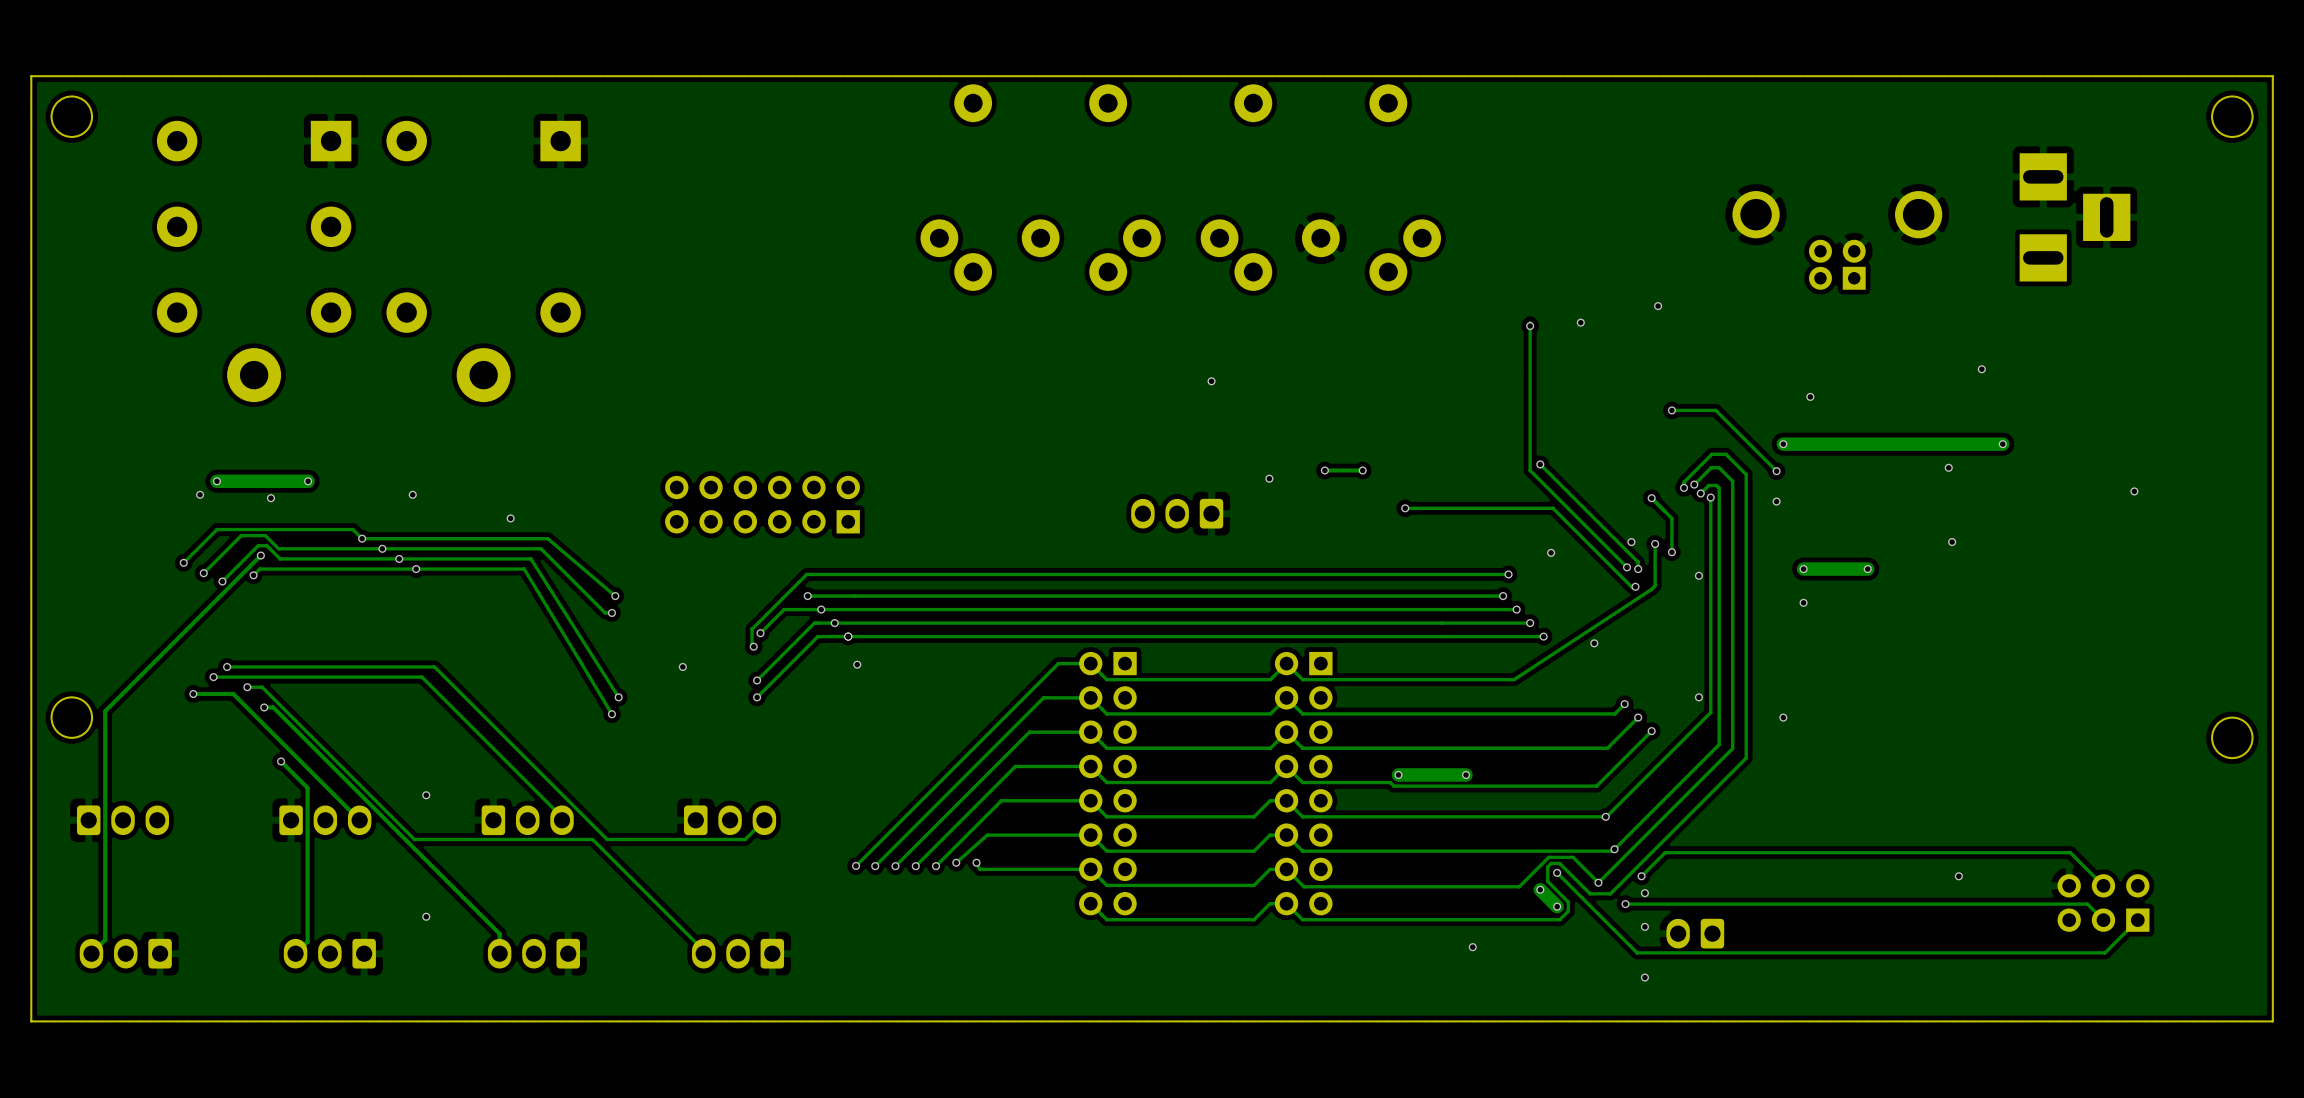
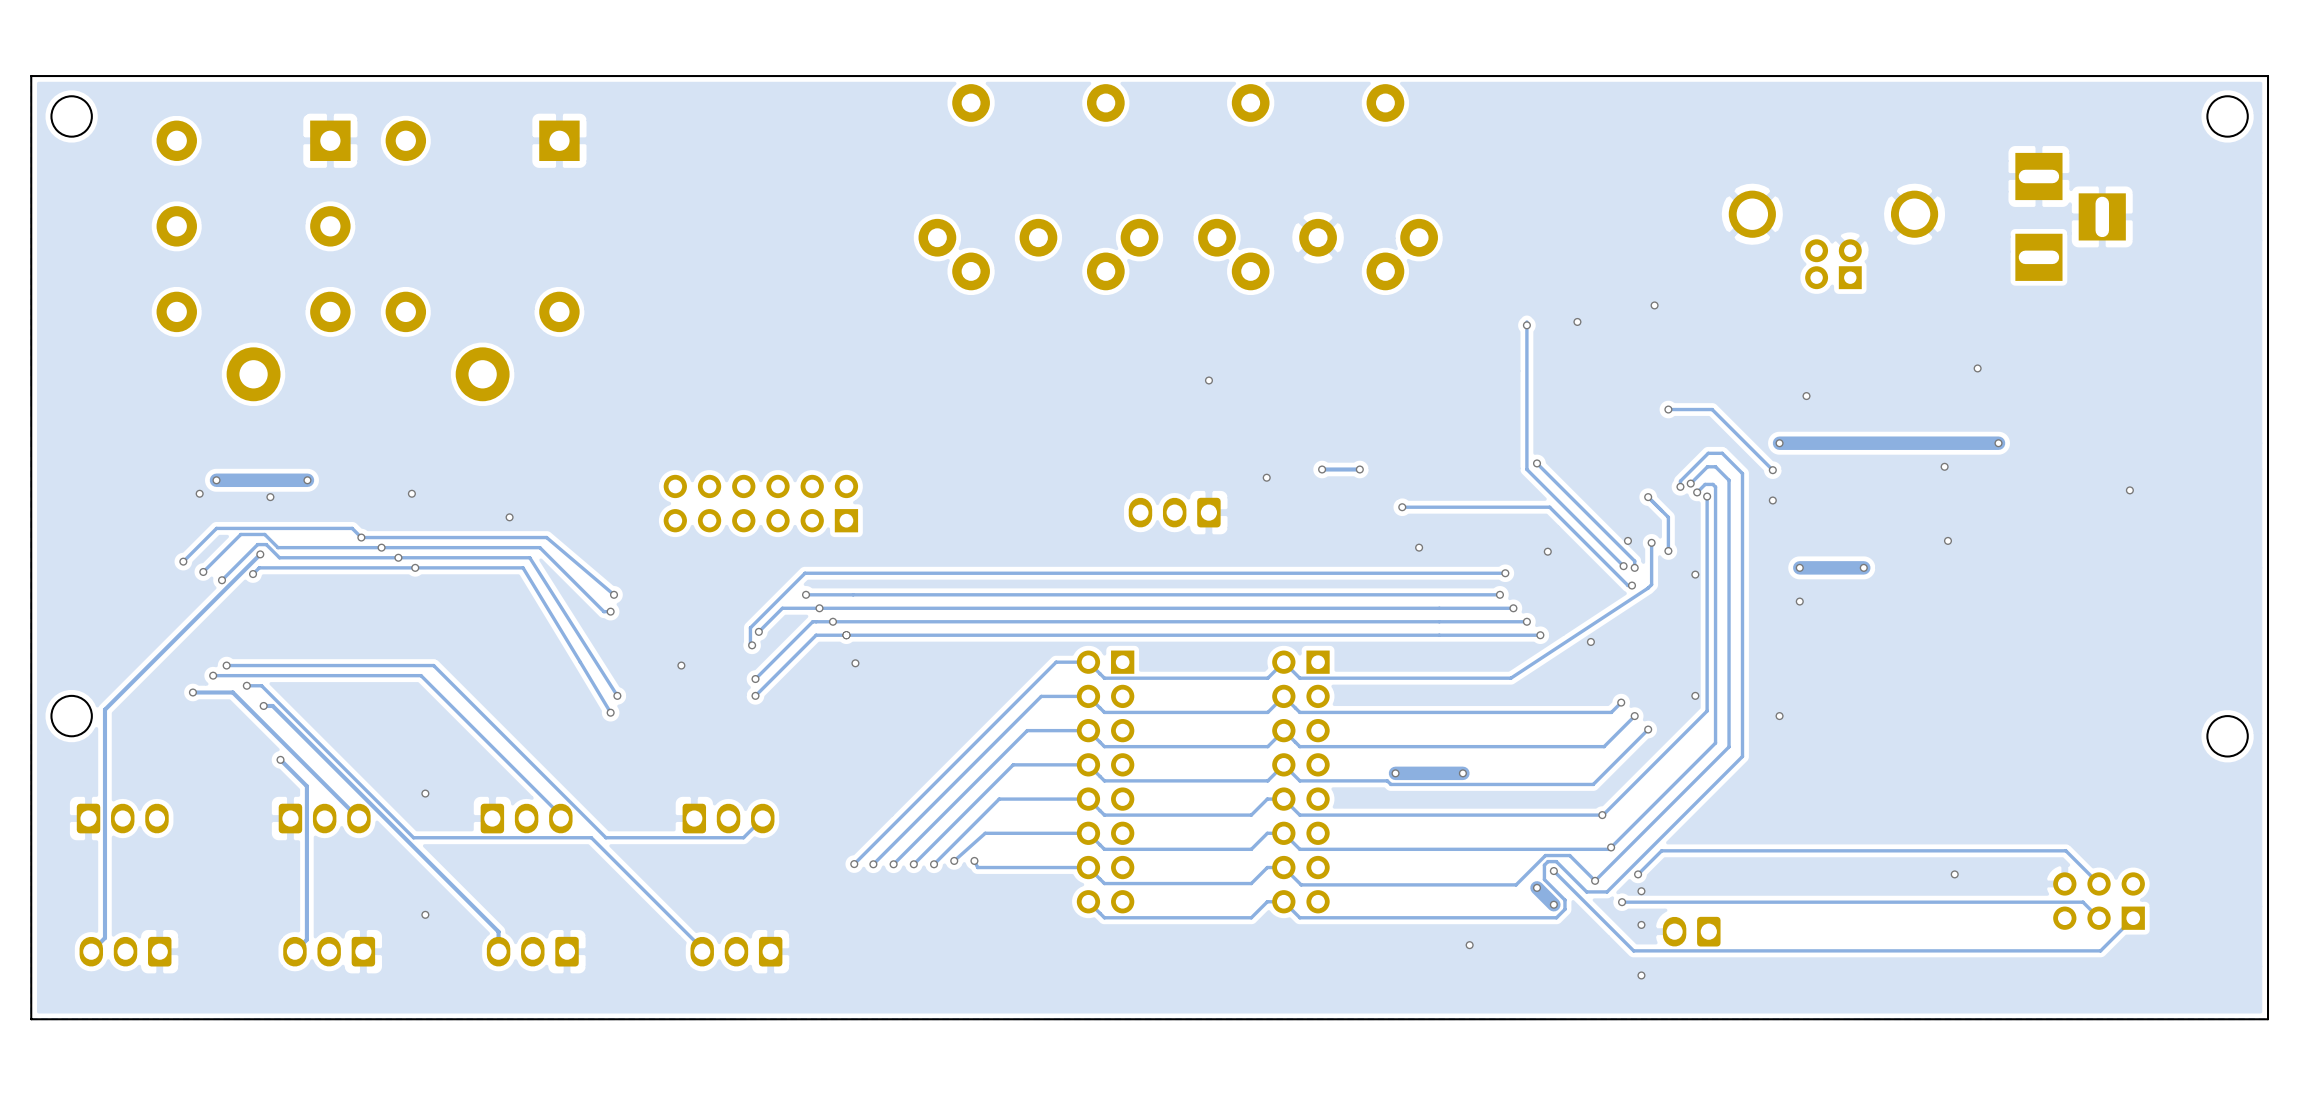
via: none -> (1419, 547)

